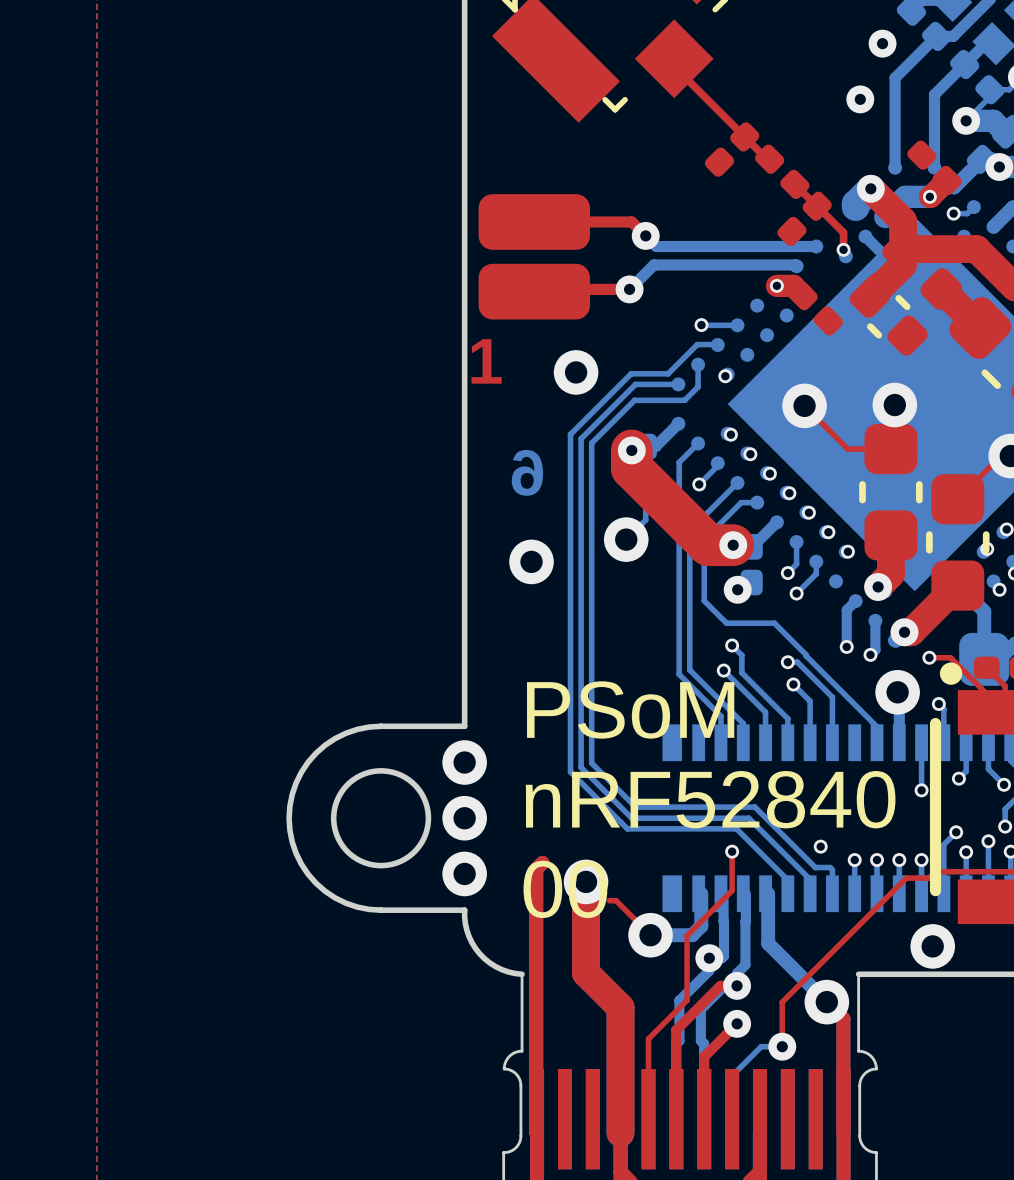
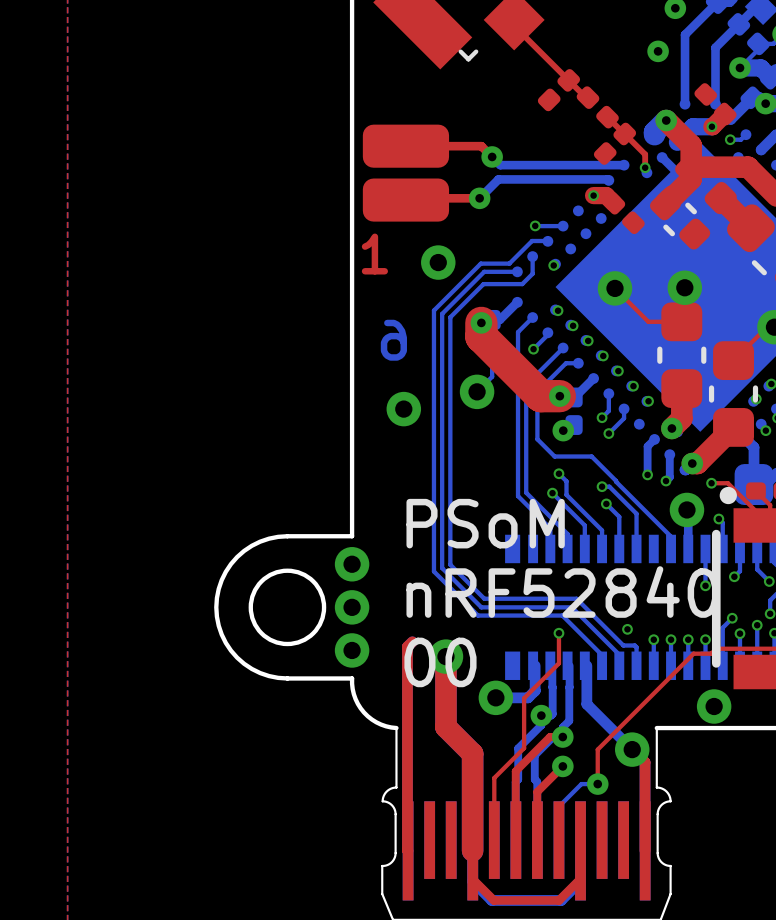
top track: (609, 900) (616, 900) (650, 935) -> none

